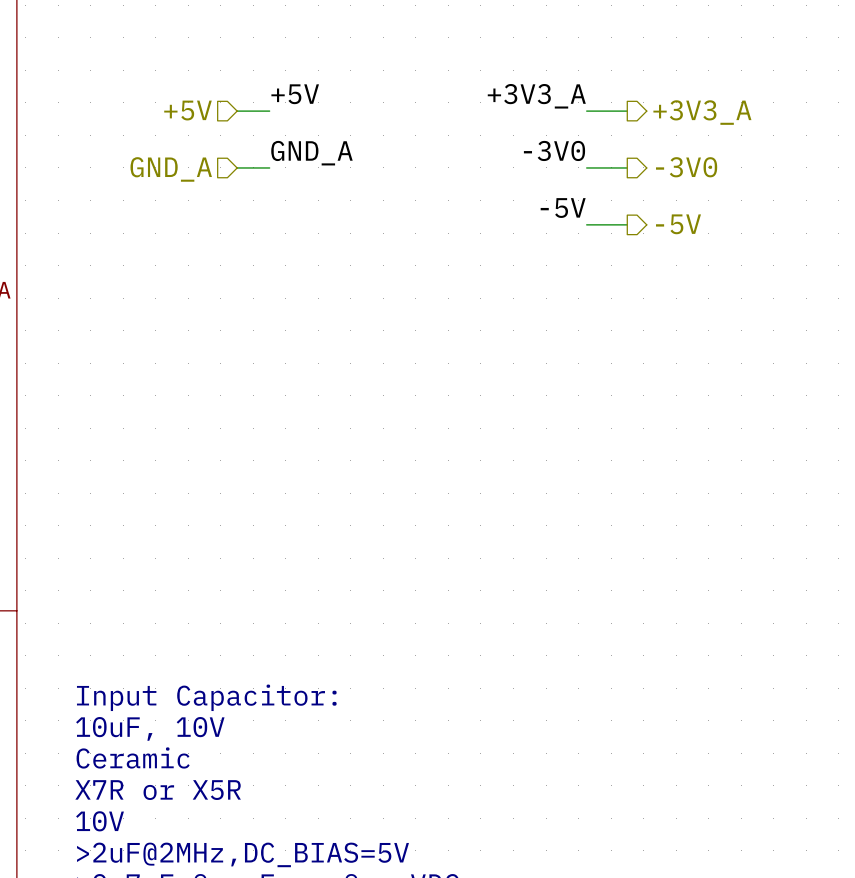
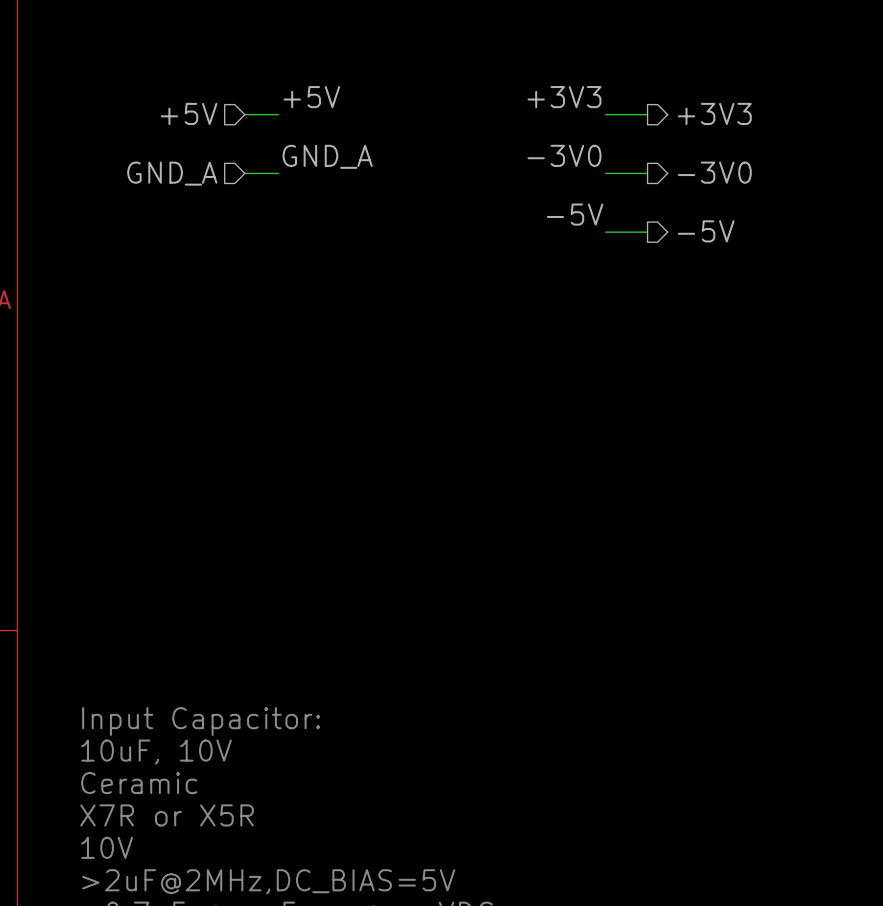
label: +3V3_A (536, 96) -> +3V3 (564, 97)
hierarchical label: +3V3_A (702, 112) -> +3V3 (714, 113)

